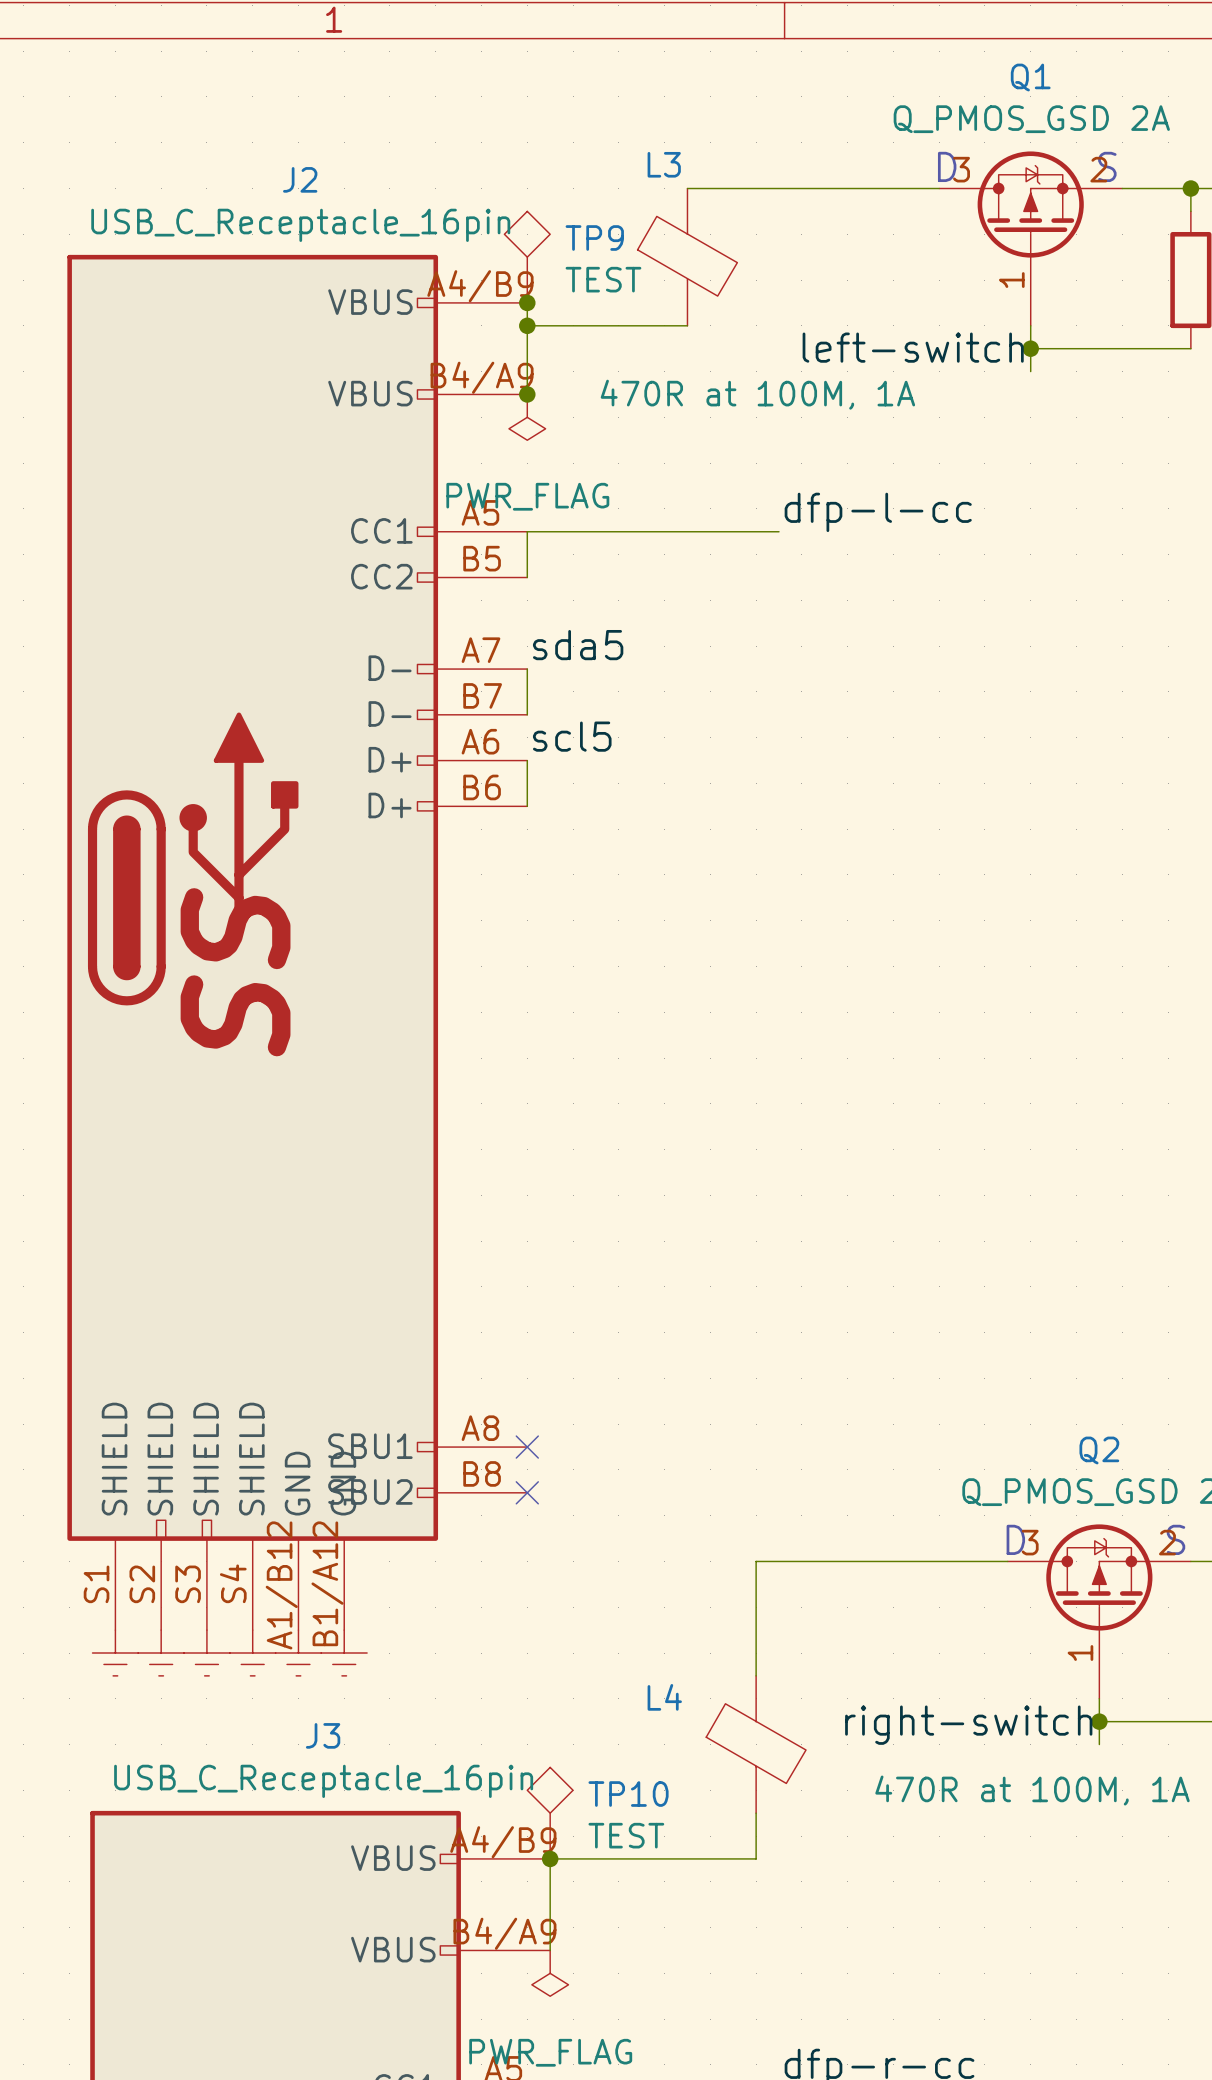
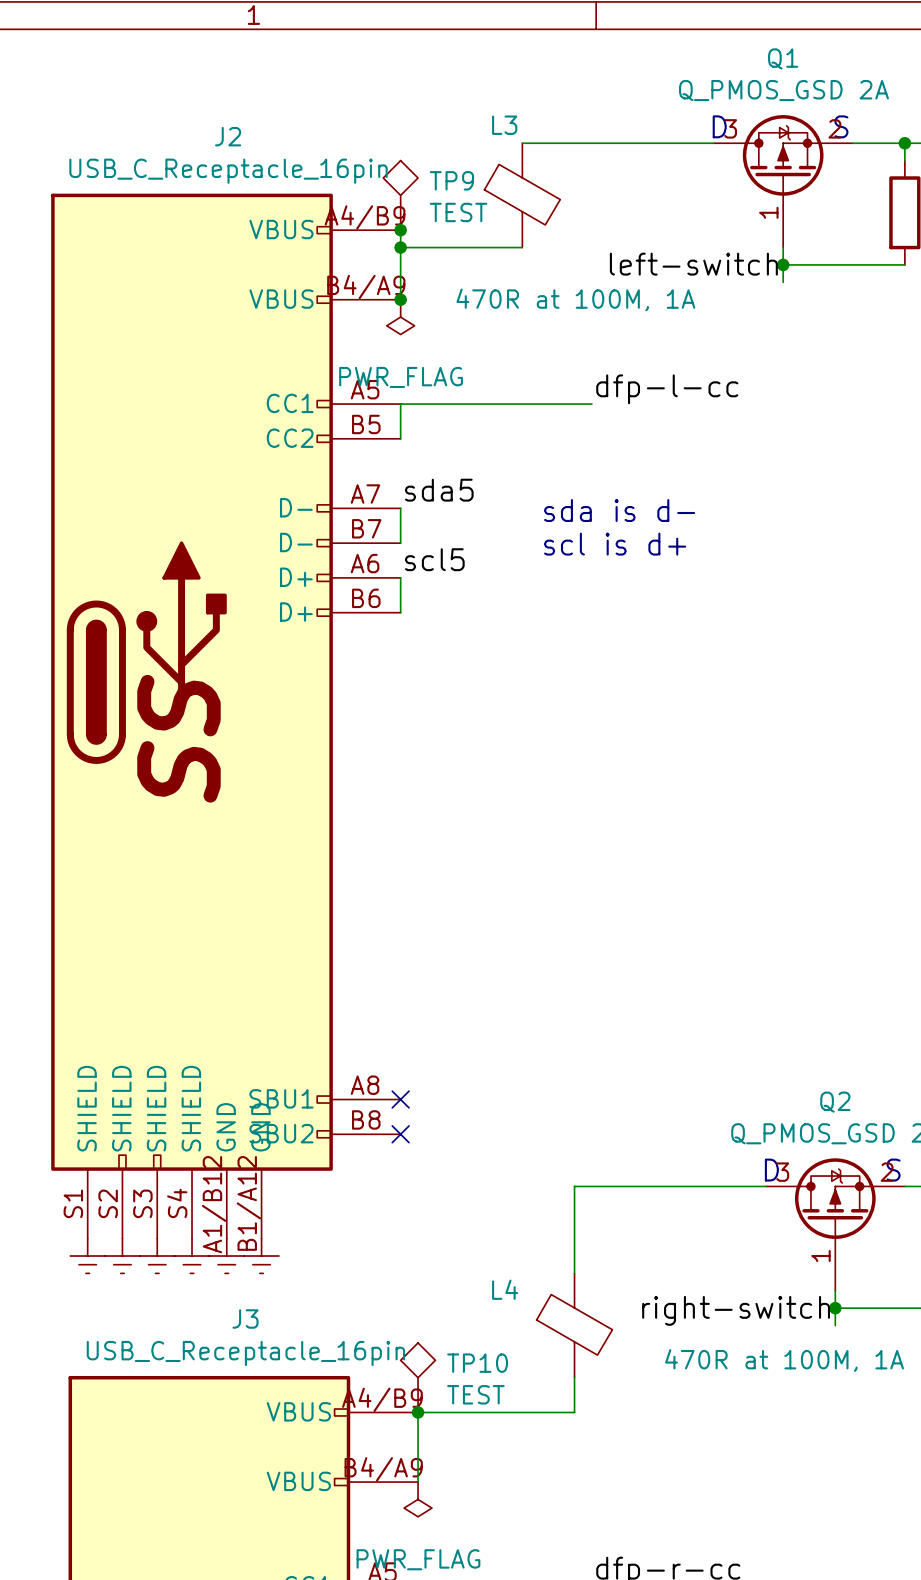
text: none -> sda is d- (619, 510)
text: none -> scl is d+ (615, 544)

